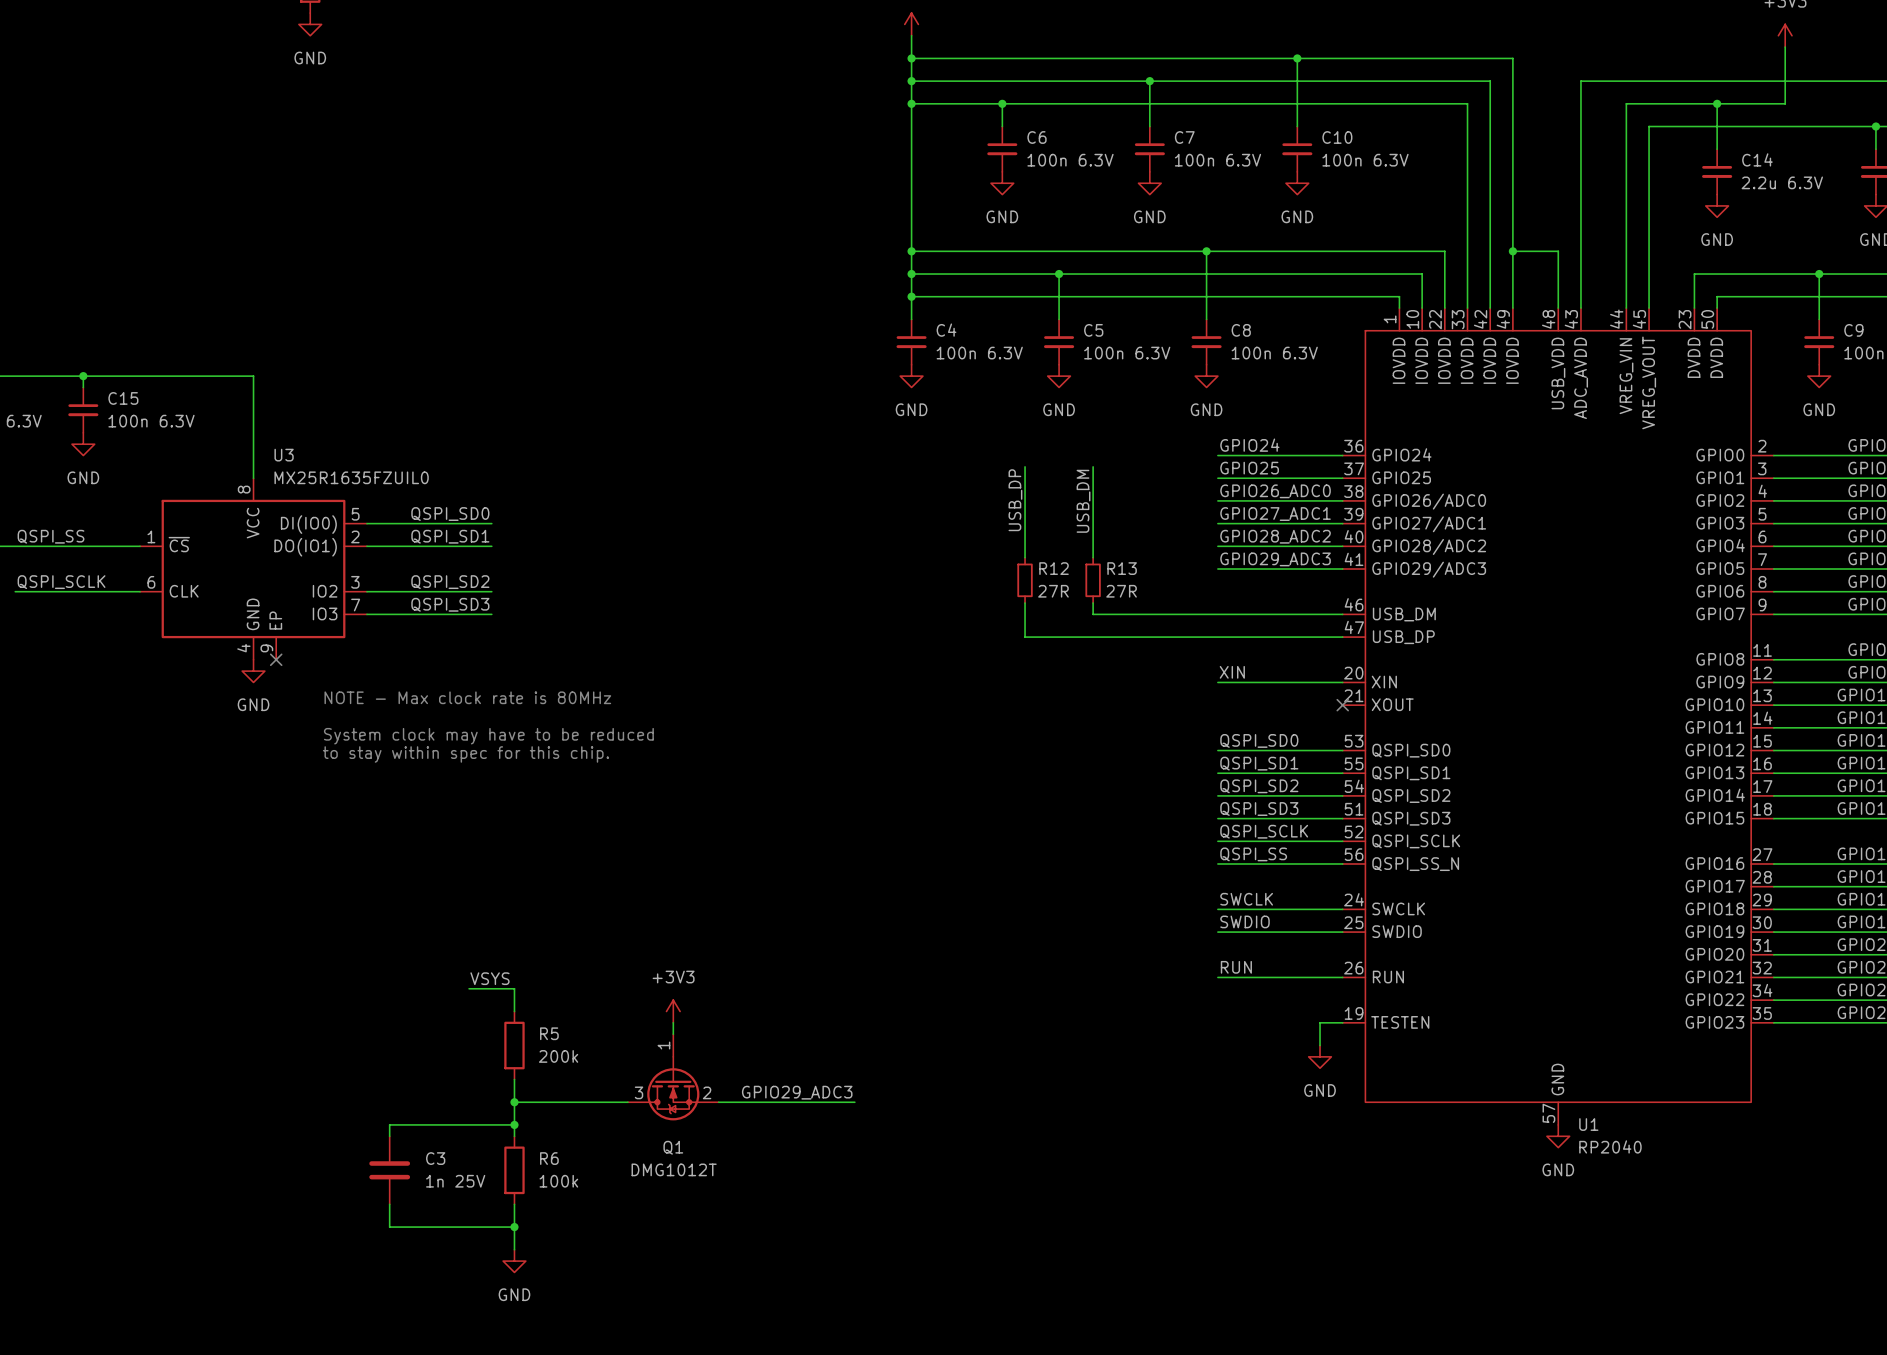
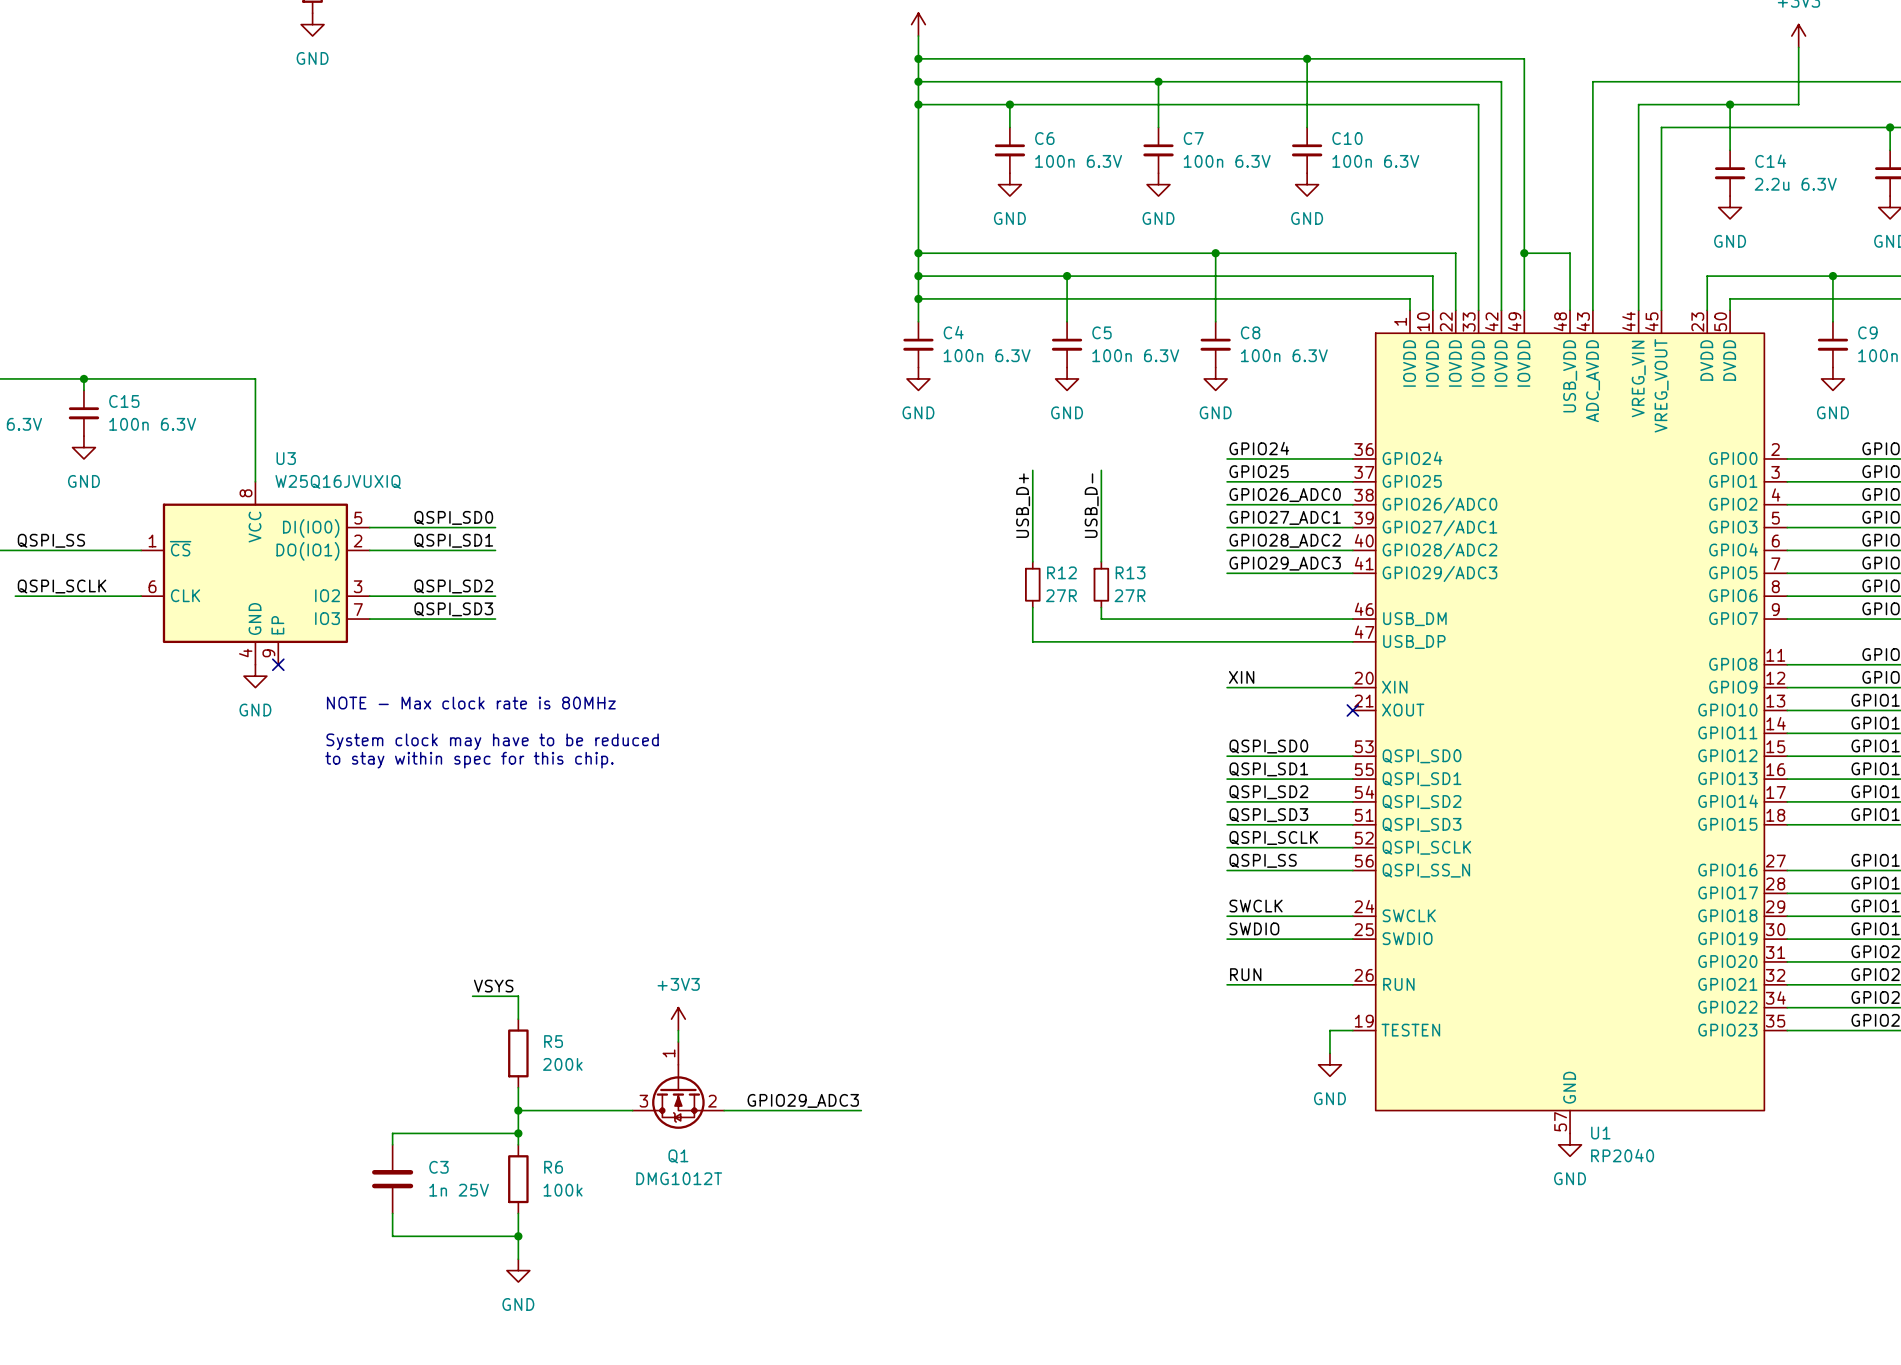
U3 value: MX25R1635FZUIL0 (351, 477) -> W25Q16JVUXIQ (338, 481)
label: USB_DP (1015, 500) -> USB_D+ (1023, 505)
label: USB_DM (1083, 501) -> USB_D- (1091, 505)

